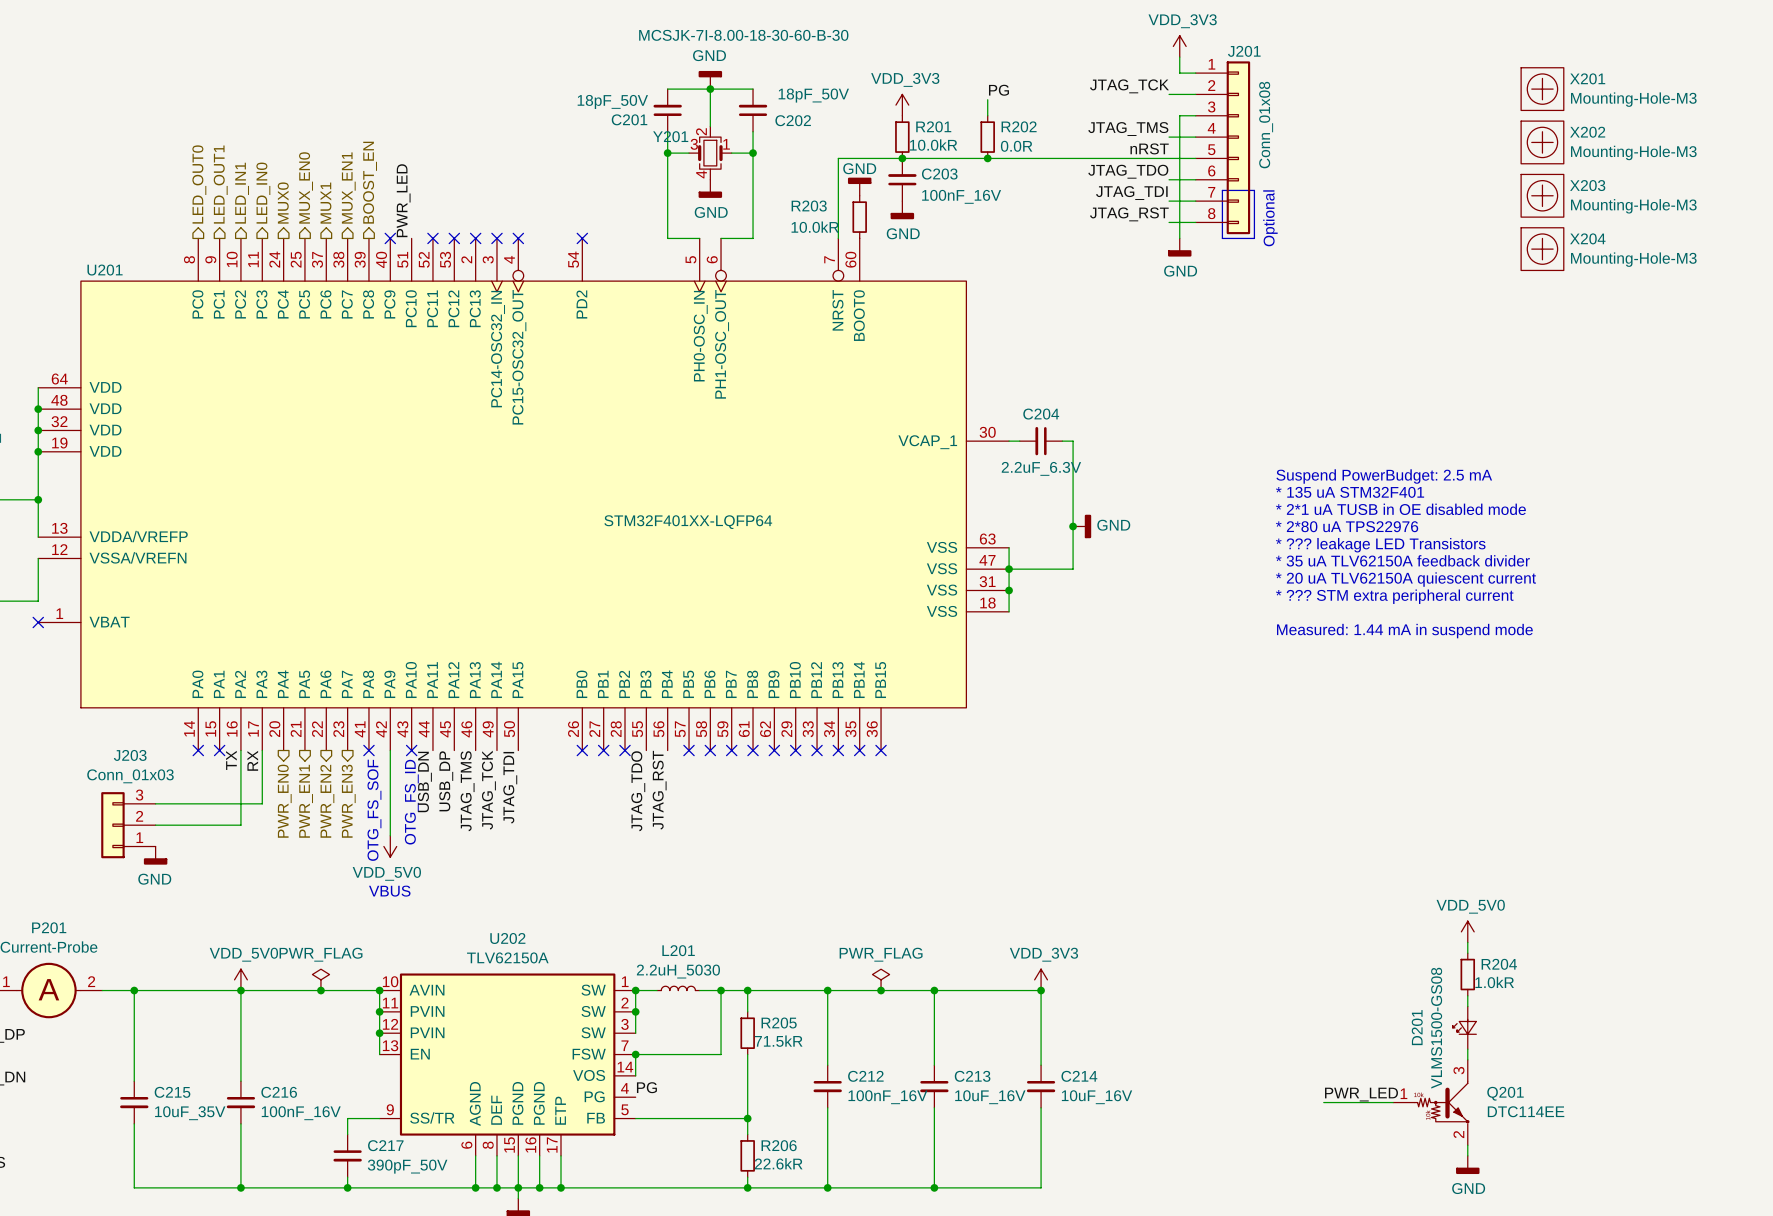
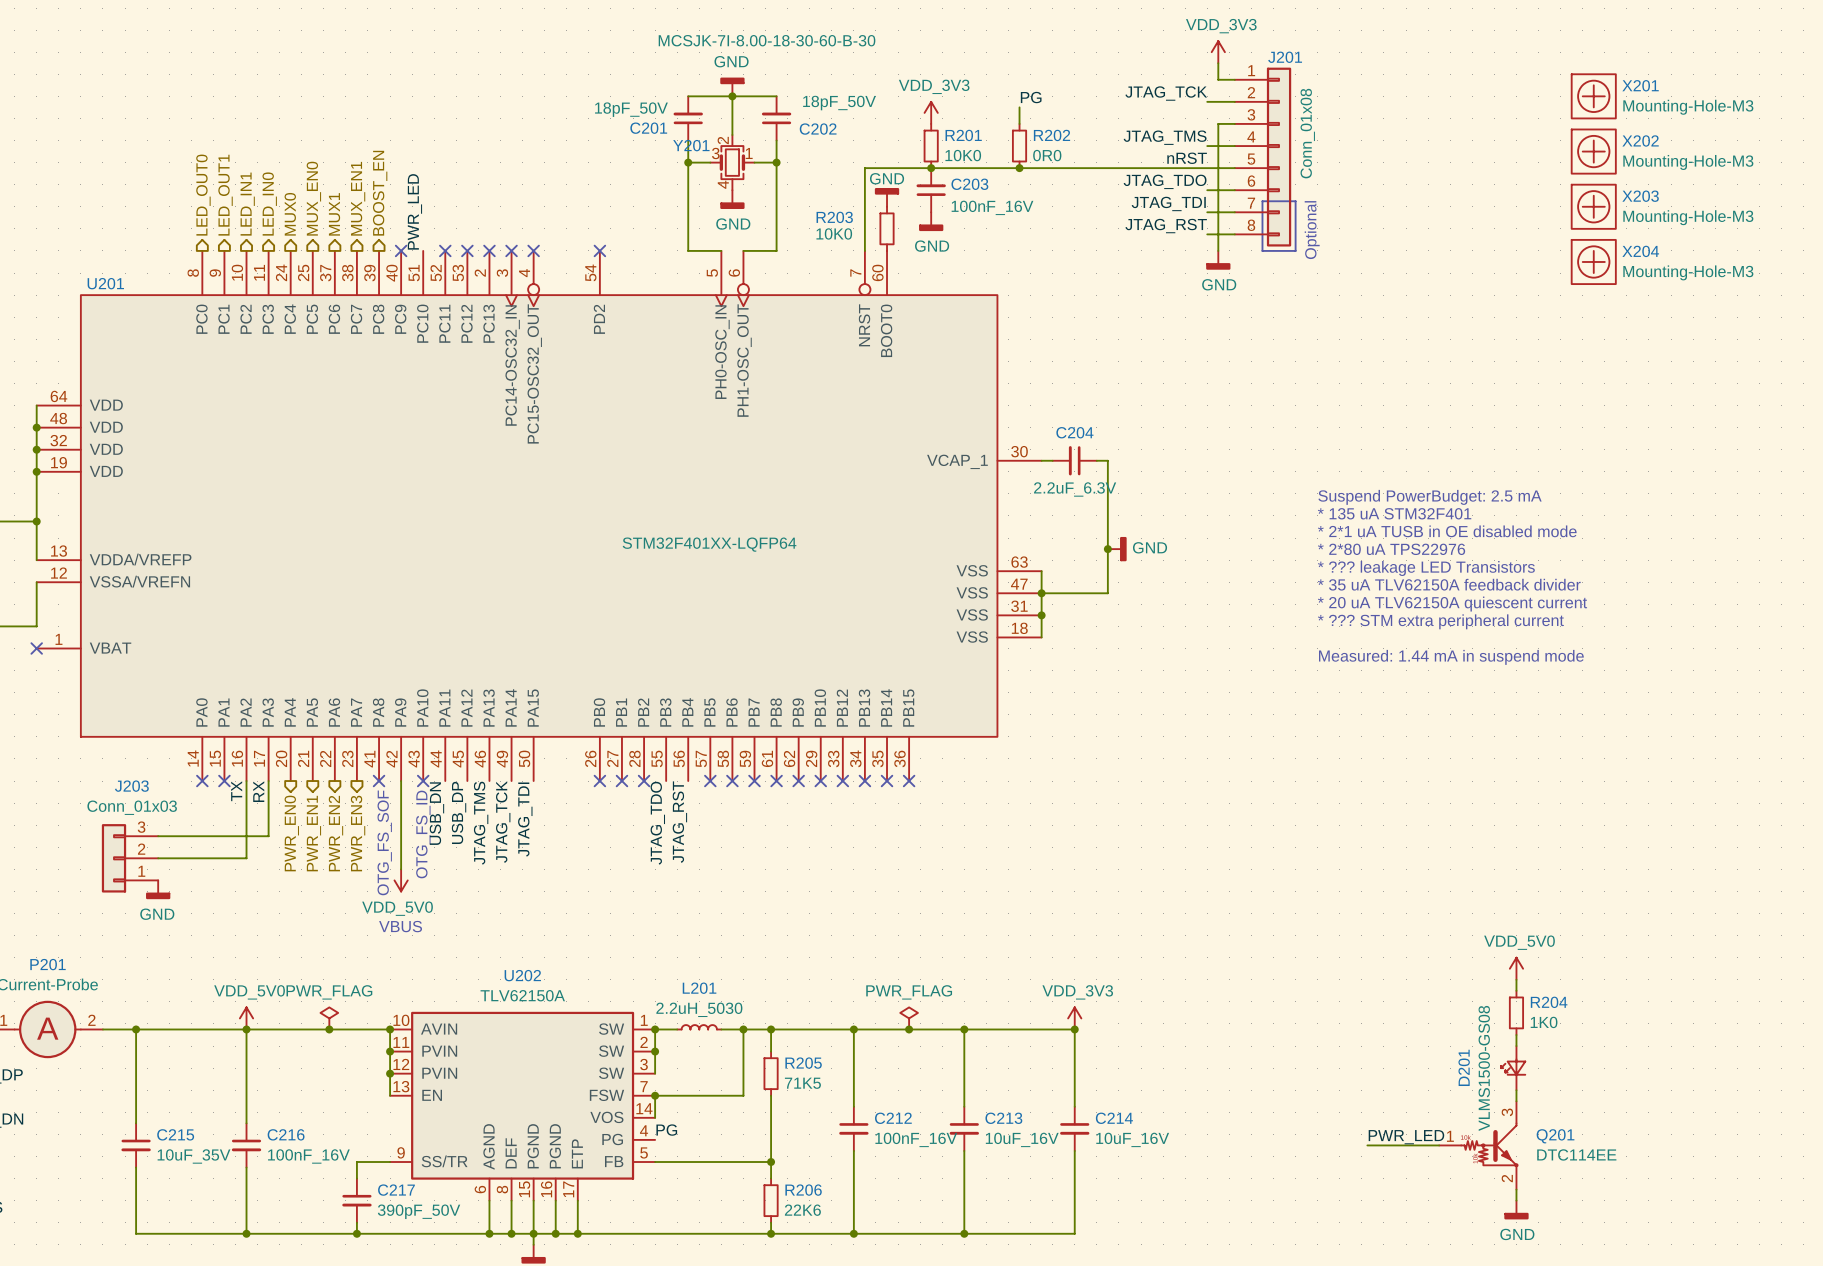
R201 value: 10.0kR (933, 145) -> 10K0 (963, 155)
R202 value: 0.0R (1016, 146) -> 0R0 (1047, 155)
R203 value: 10.0kR (815, 227) -> 10K0 (834, 233)
R204 value: 1.0kR (1494, 982) -> 1K0 (1544, 1022)
R205 value: 71.5kR (778, 1041) -> 71K5 (802, 1083)
R206 value: 22.6kR (778, 1163) -> 22K6 (802, 1210)

